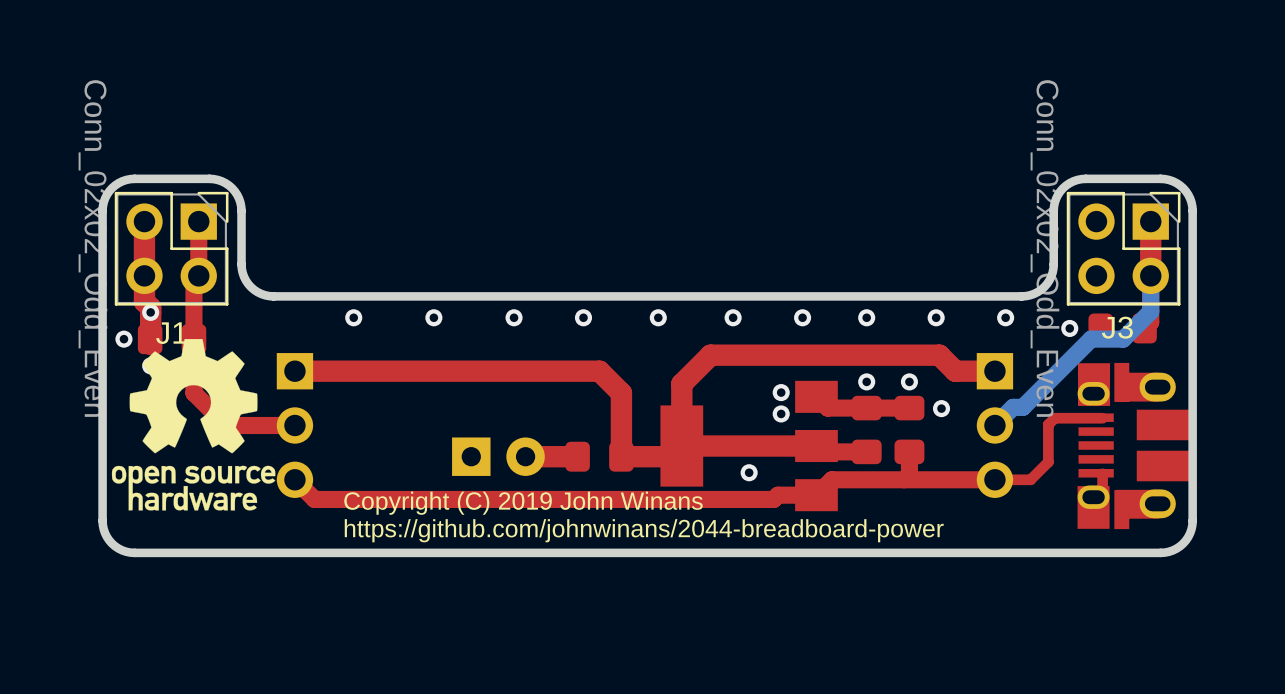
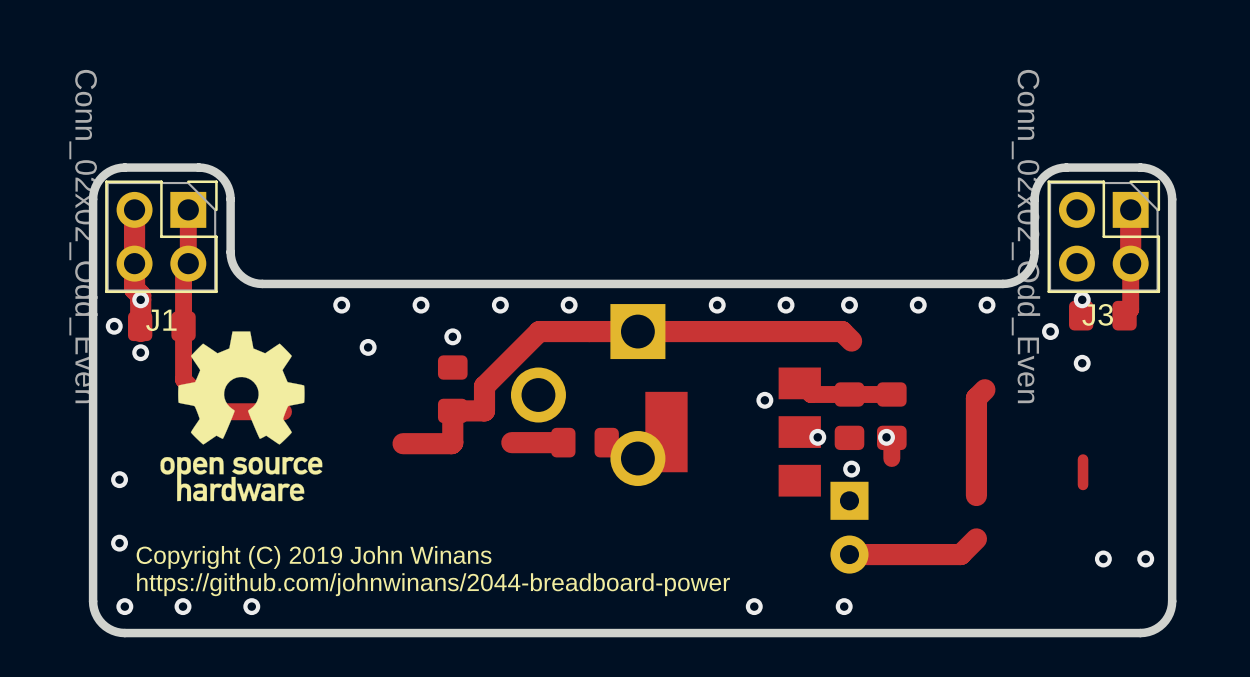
bottom track: (1150, 275) (1150, 311) (1123, 339) (1091, 339) (1022, 407) (1013, 407) (994, 425) -> none
via: none -> (1082, 299)
via: (658, 317) -> none
via position: (1069, 328) -> (1050, 331)
via: none -> (452, 336)
top track: none -> (851, 341) (842, 331) (539, 331) (484, 386) (484, 410) (452, 410) (451, 443) (403, 443)
via: none -> (368, 347)
top track: (294, 371) (599, 371) (621, 393) (621, 456) (671, 456) (681, 446) -> none
top track: (994, 371) (955, 371) (939, 355) (710, 355) (681, 384) (681, 446) -> none
via: none -> (1082, 363)
via: (866, 381) -> none
via: (909, 381) -> none
via: (781, 392) -> none
part: none -> (452, 389)
top track: none -> (984, 389) (976, 398) (976, 495)
part: none -> (588, 395)
via: (941, 408) -> none
top track: (1102, 418) (1054, 418) (1048, 424) (1048, 462) (1030, 479) (831, 479) (816, 495) (778, 495) (773, 499) (314, 499) (294, 479) -> none
drawing position: (193, 424) -> (241, 416)
part: (294, 425) -> none
part: (994, 425) -> none
top track: (681, 446) (816, 446) (822, 451) (866, 451) -> none
part: (1133, 446) -> none
via: none -> (817, 437)
via: none -> (886, 437)
part rotation: 0° (498, 456) -> 90° clockwise (849, 527)
part position: (498, 456) -> (849, 527)
via: (749, 472) -> none
via: none -> (851, 469)
via: none -> (119, 479)
text position: Copyright (C) 2019 John Winans (523, 503) -> Copyright (C) 2019 John Winans (314, 557)
board edge: (1192, 520) (1190, 533) (1183, 543) (1172, 550) (1160, 552) (134, 552) (122, 550) (111, 543) (105, 533) (102, 520) -> (1172, 506) (1171, 609) (1165, 620) (1159, 626) (1152, 630) (1140, 633) (120, 632) (105, 626) (99, 620) (94, 609) (93, 506)
text position: https://github.com/johnwinans/2044-breadboard-power (644, 530) -> https://github.com/johnwinans/2044-breadboard-power (433, 584)
top track: none -> (976, 538) (960, 554) (849, 554)
via: none -> (119, 543)
via: none -> (1103, 559)
via: none -> (1145, 559)
via: none -> (124, 606)
via: none -> (183, 606)
via: none -> (251, 606)
via: none -> (754, 606)
via: none -> (844, 606)

